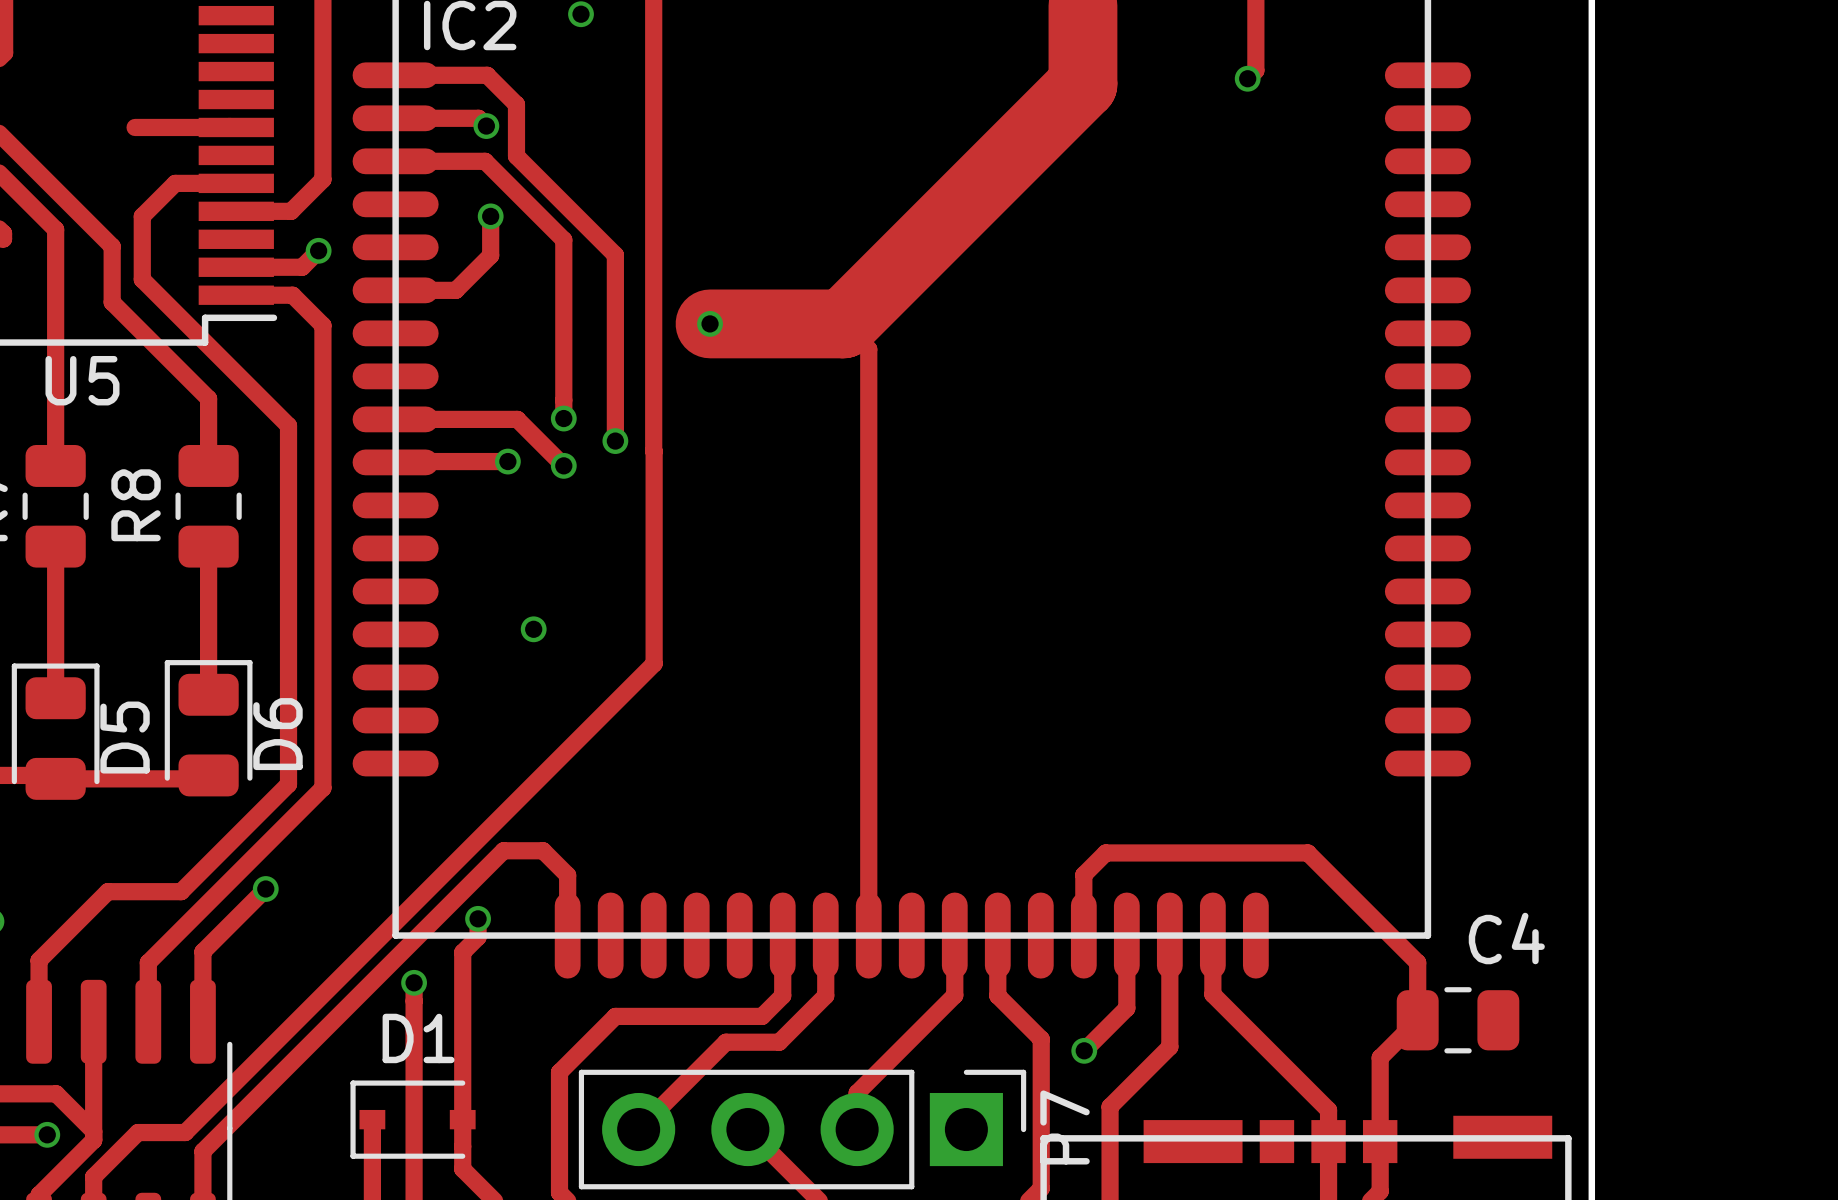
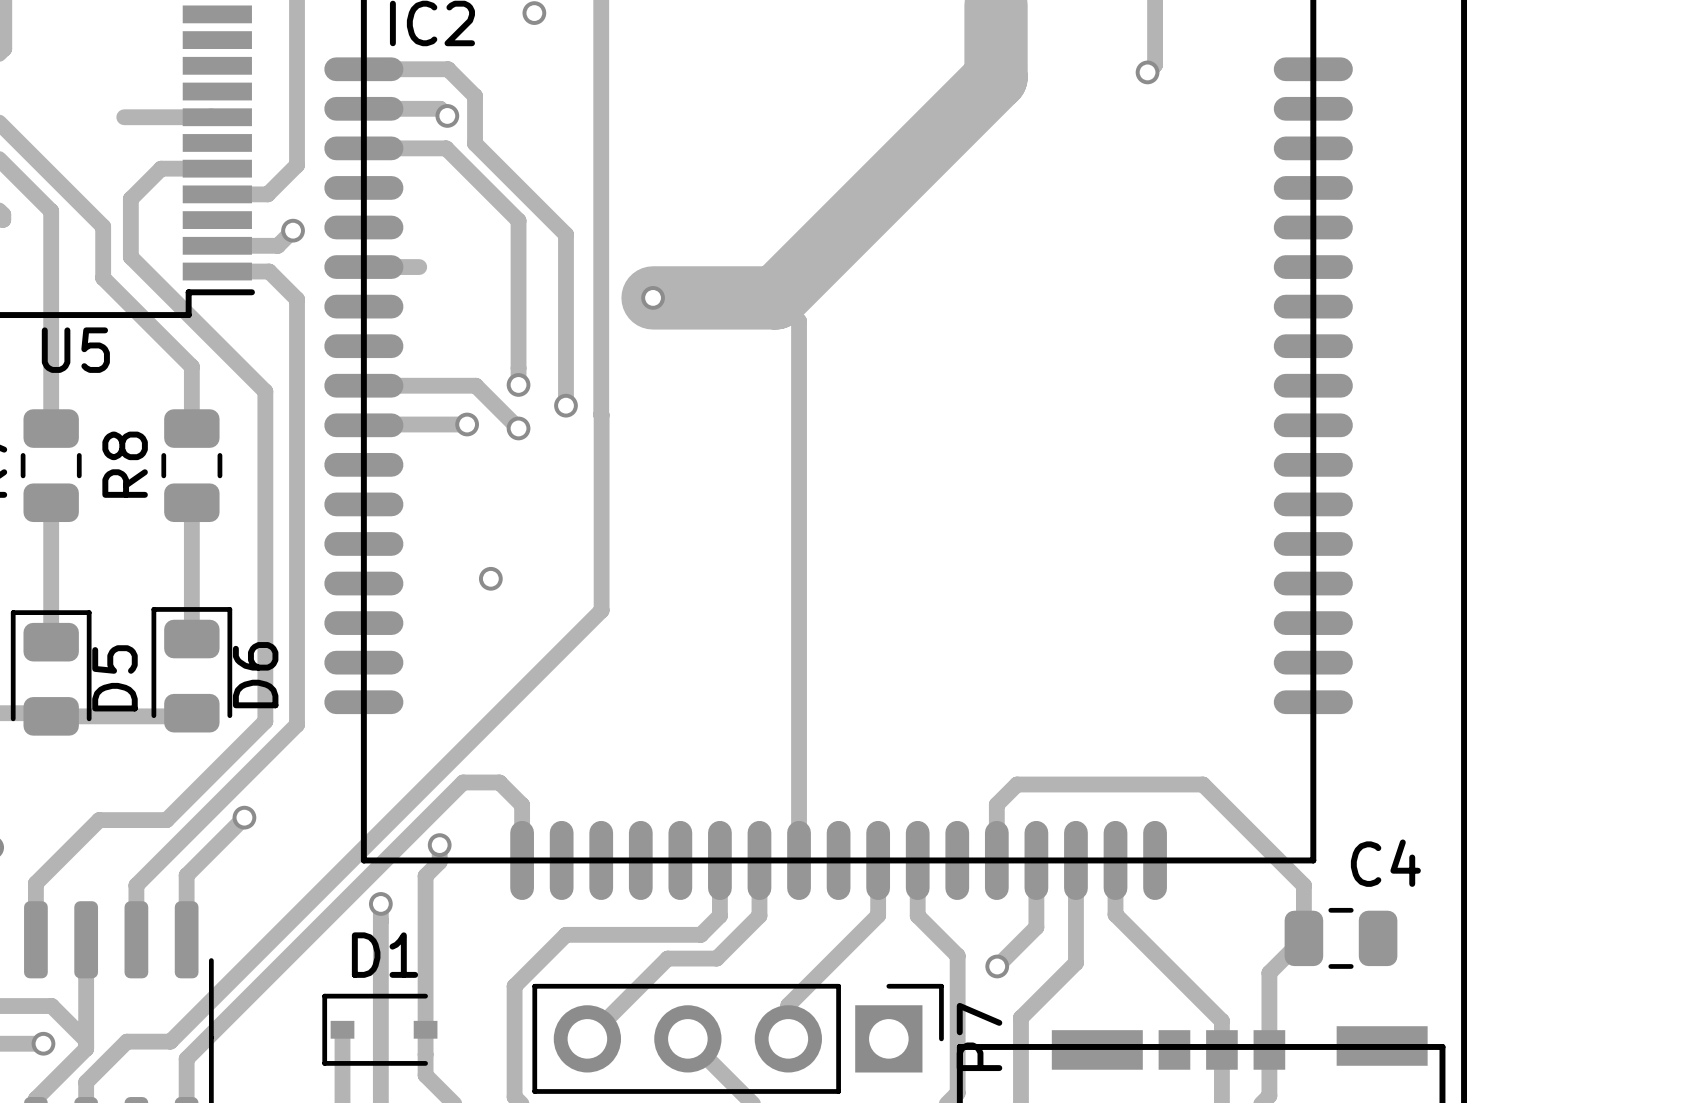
track: (490, 216) (490, 255) (455, 290) -> none
via: (490, 216) -> none

